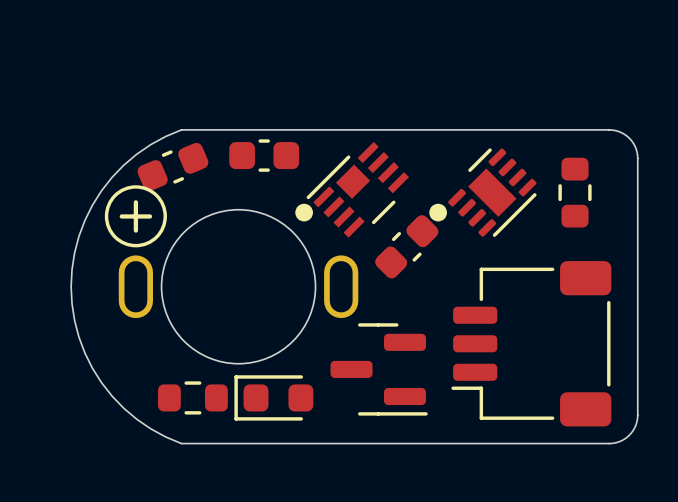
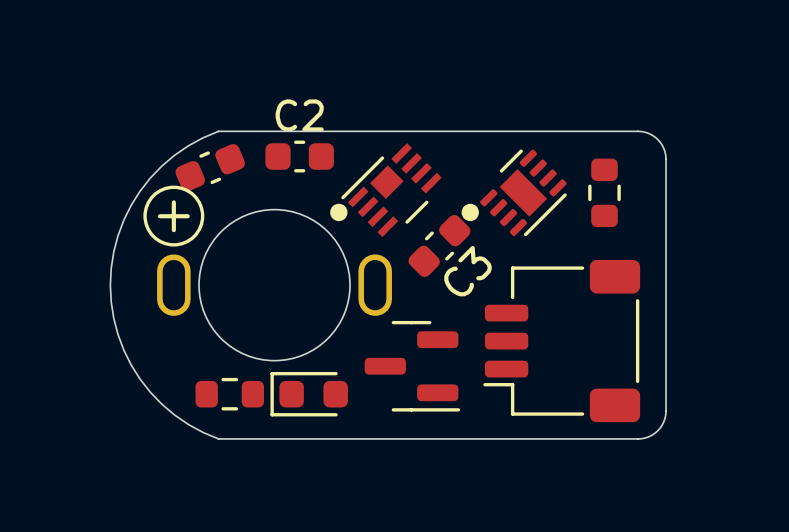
C2 name: none -> C2 (299, 115)
C3 name: none -> C3 (467, 271)

